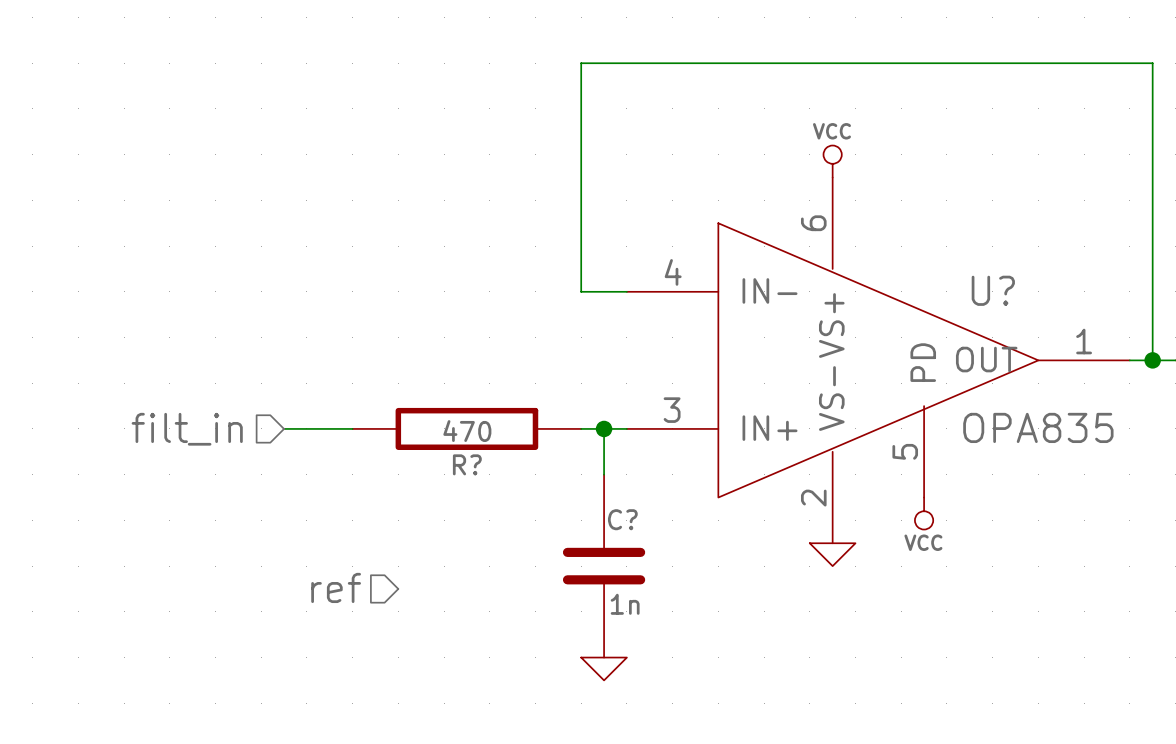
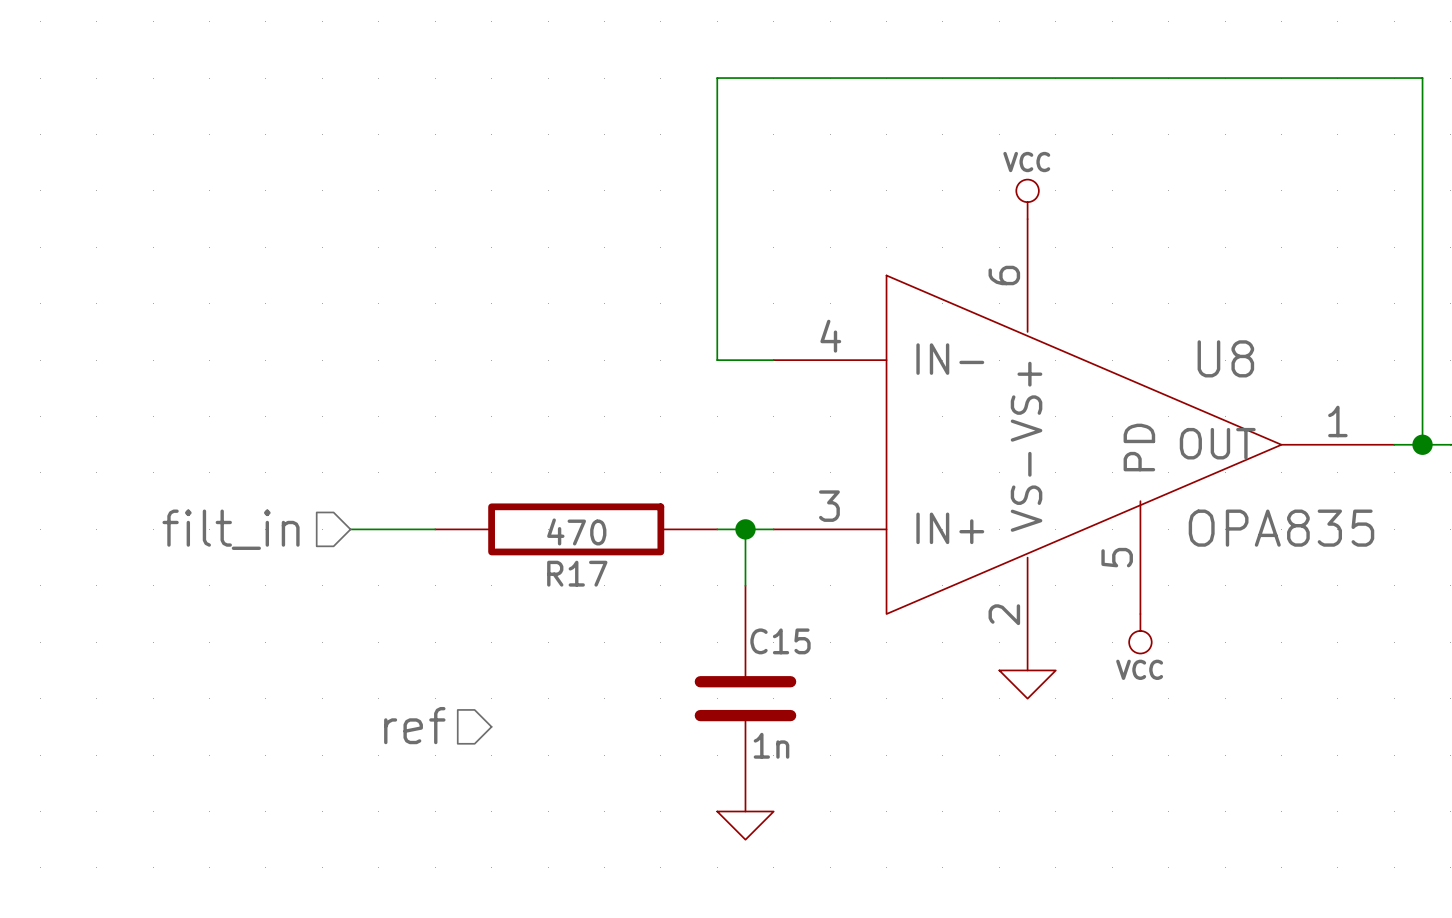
U? name: U? (993, 290) -> U8 (1225, 358)
R? name: R? (467, 464) -> R17 (577, 573)
C? name: C? (622, 519) -> C15 (780, 641)

